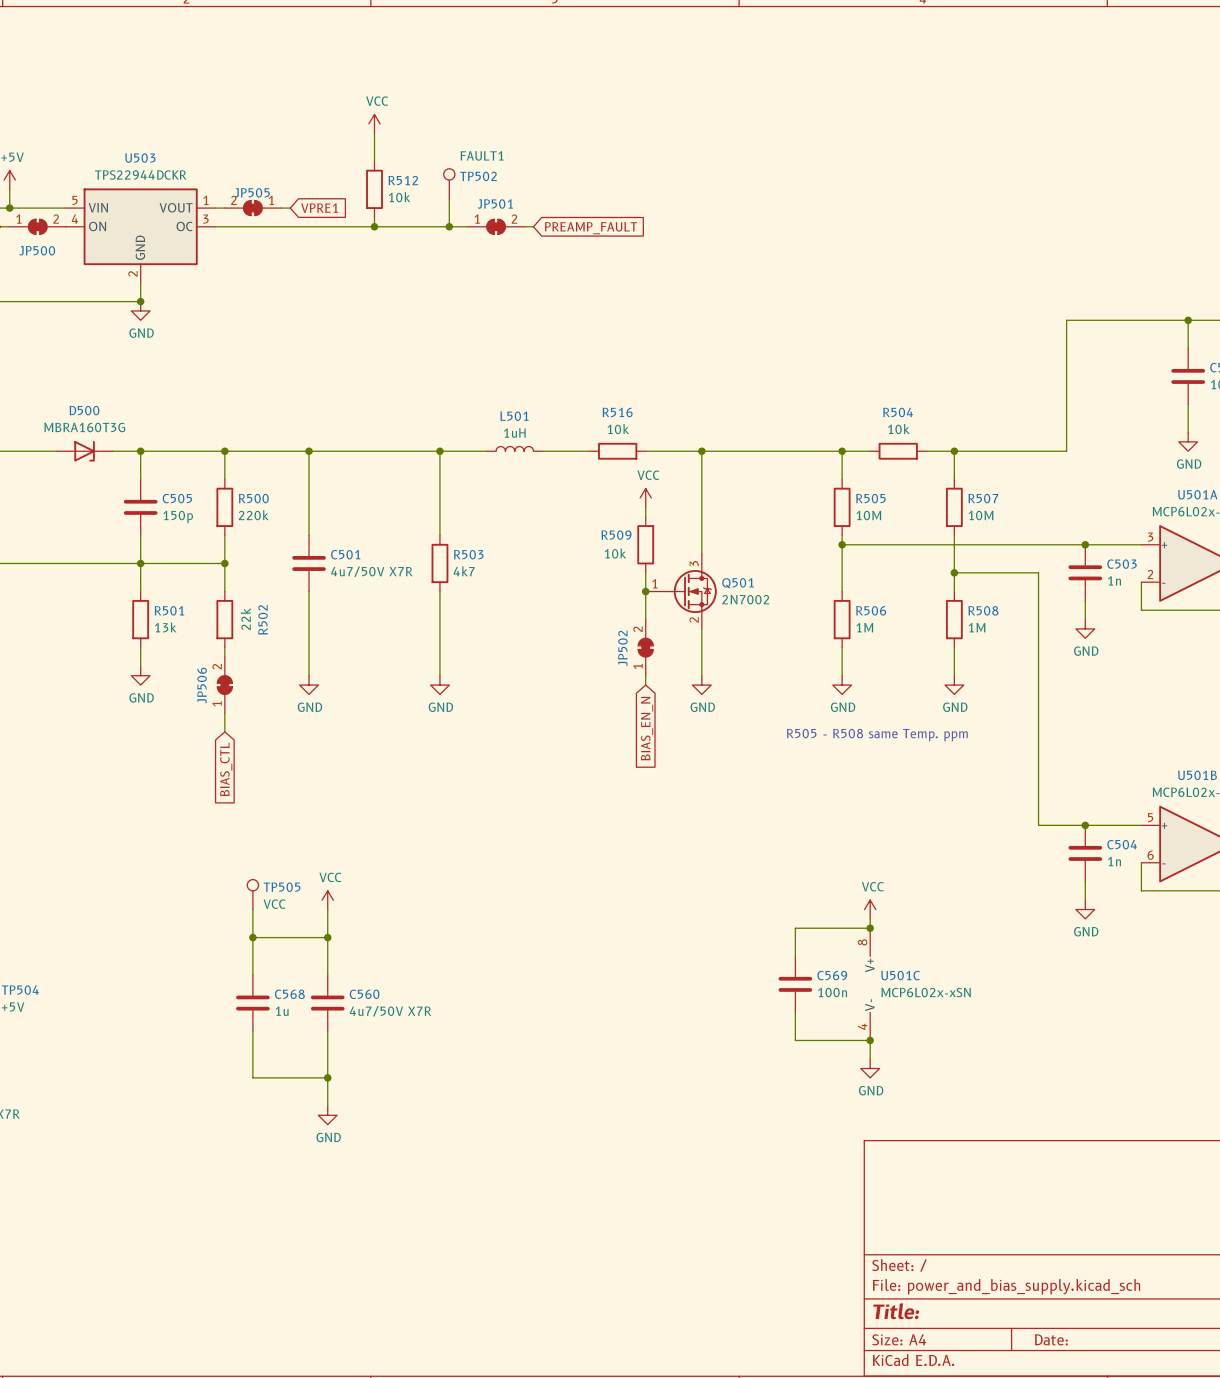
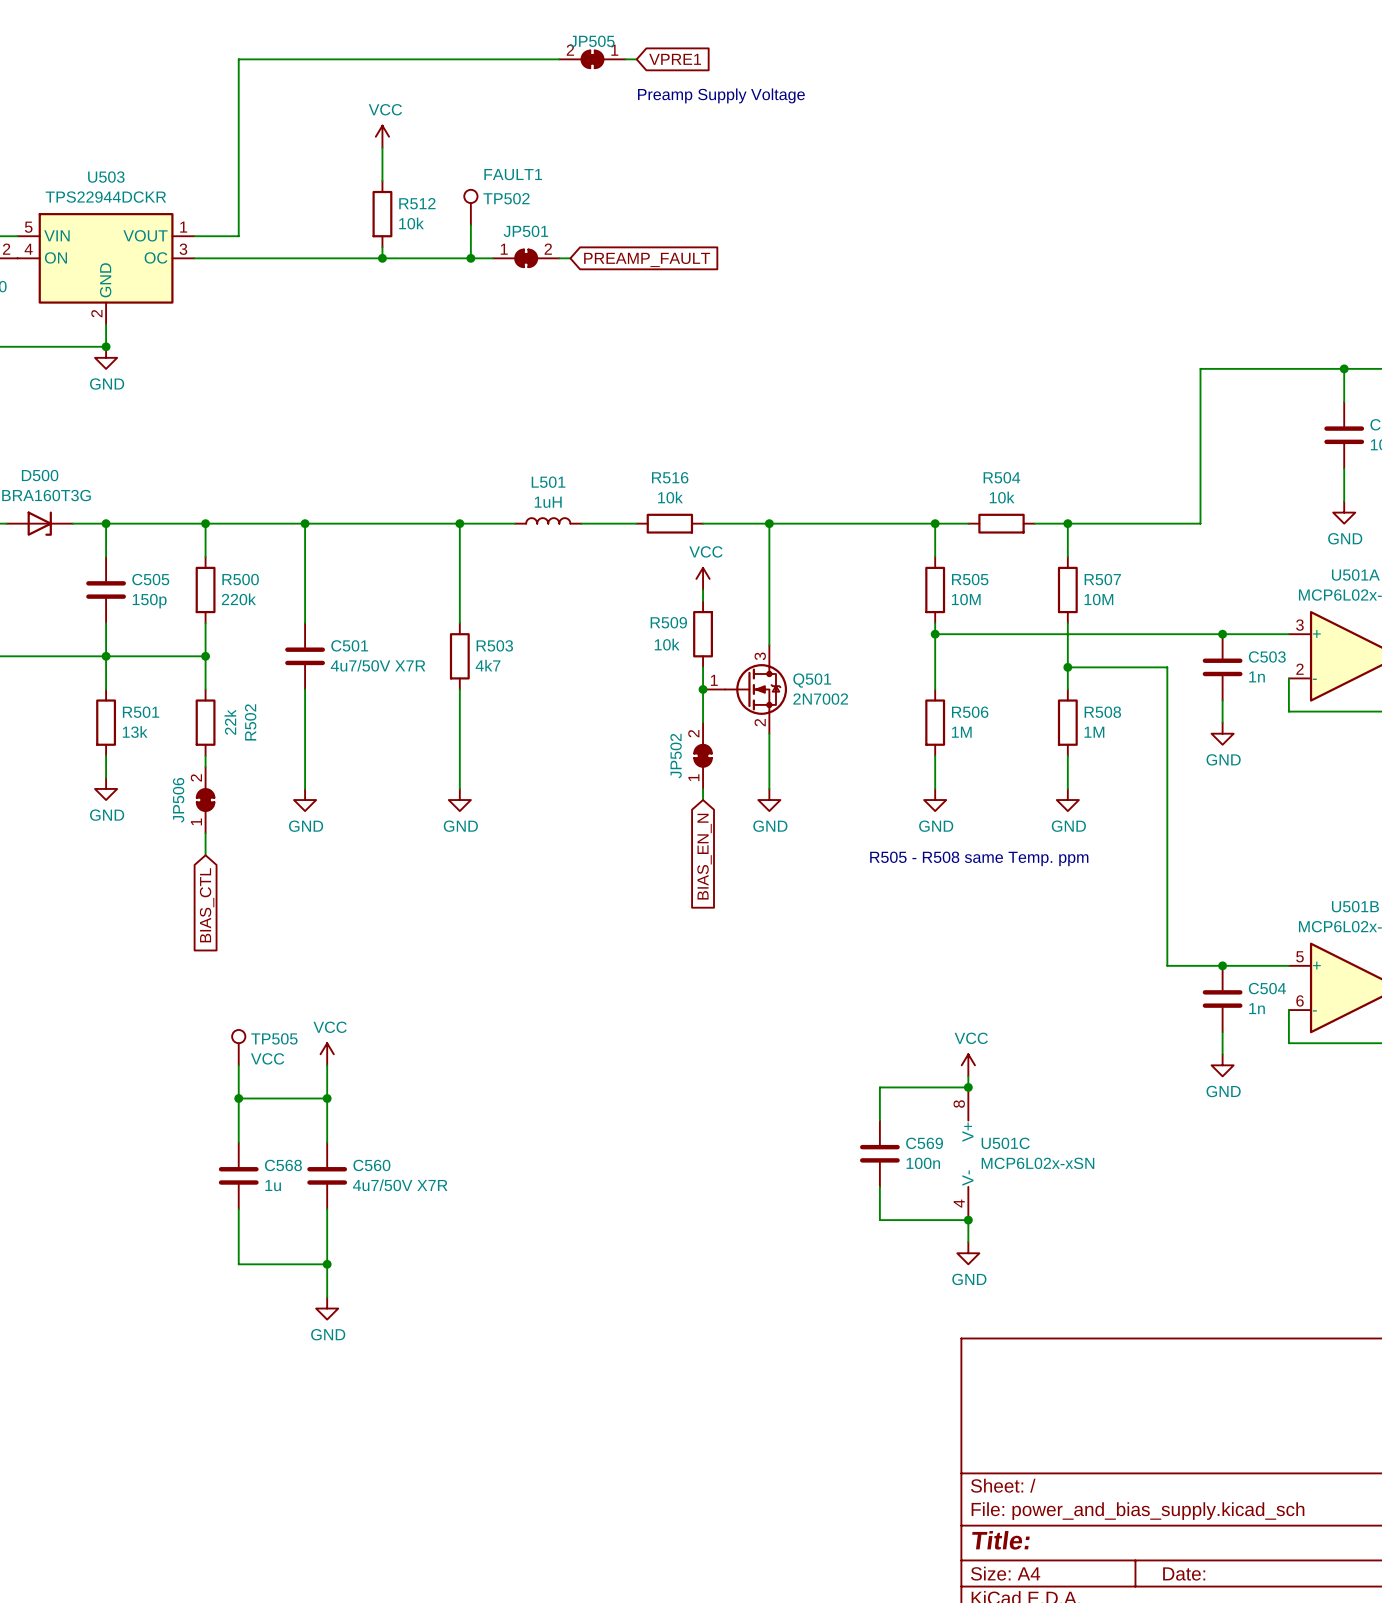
wire: none -> (559, 59) (238, 59) (238, 236) (205, 236)
wire: none -> (625, 59) (636, 59)
global label: none -> VPRE1 (675, 59)
text: none -> Preamp Supply Voltage (721, 95)
JP505 position: (252, 208) -> (592, 59)
wire: (280, 208) (290, 208) -> none
global label: VPRE1 (319, 208) -> none

